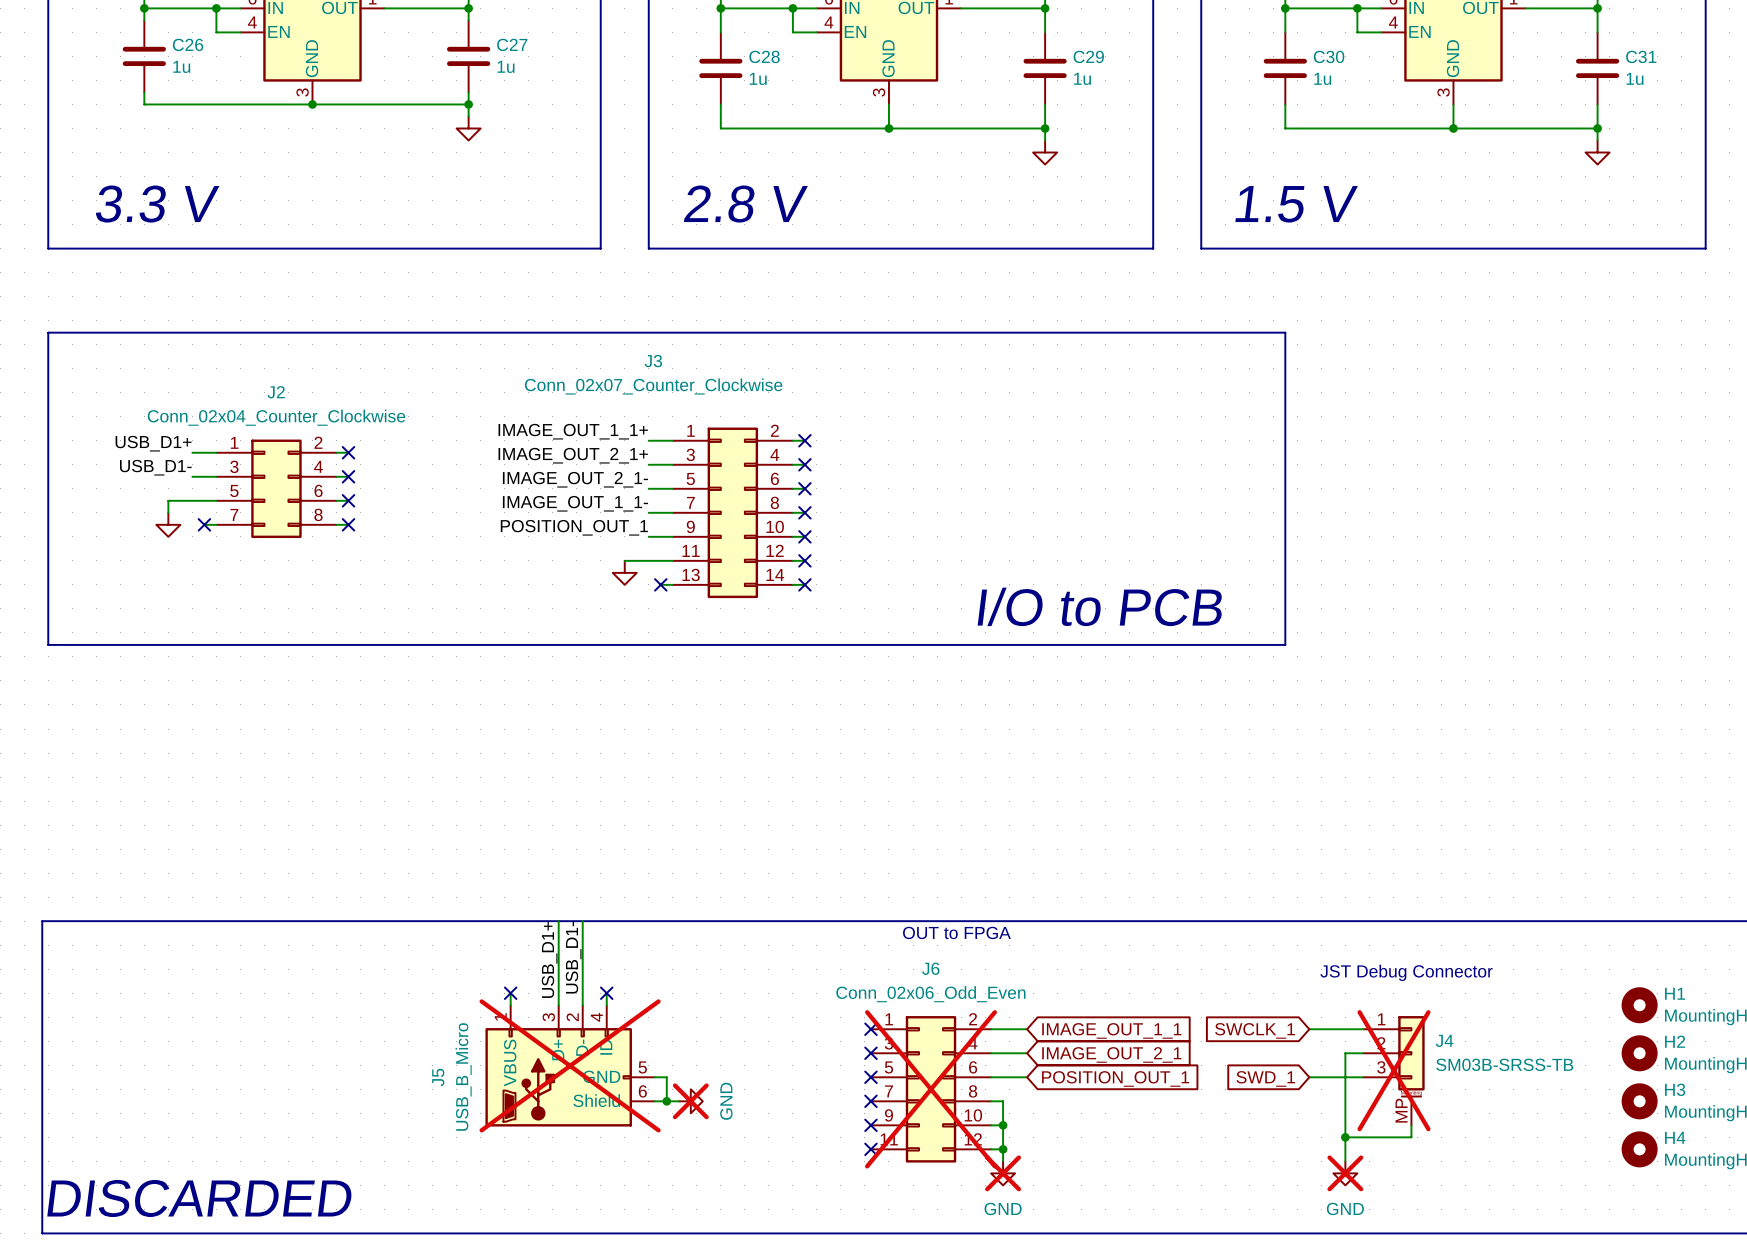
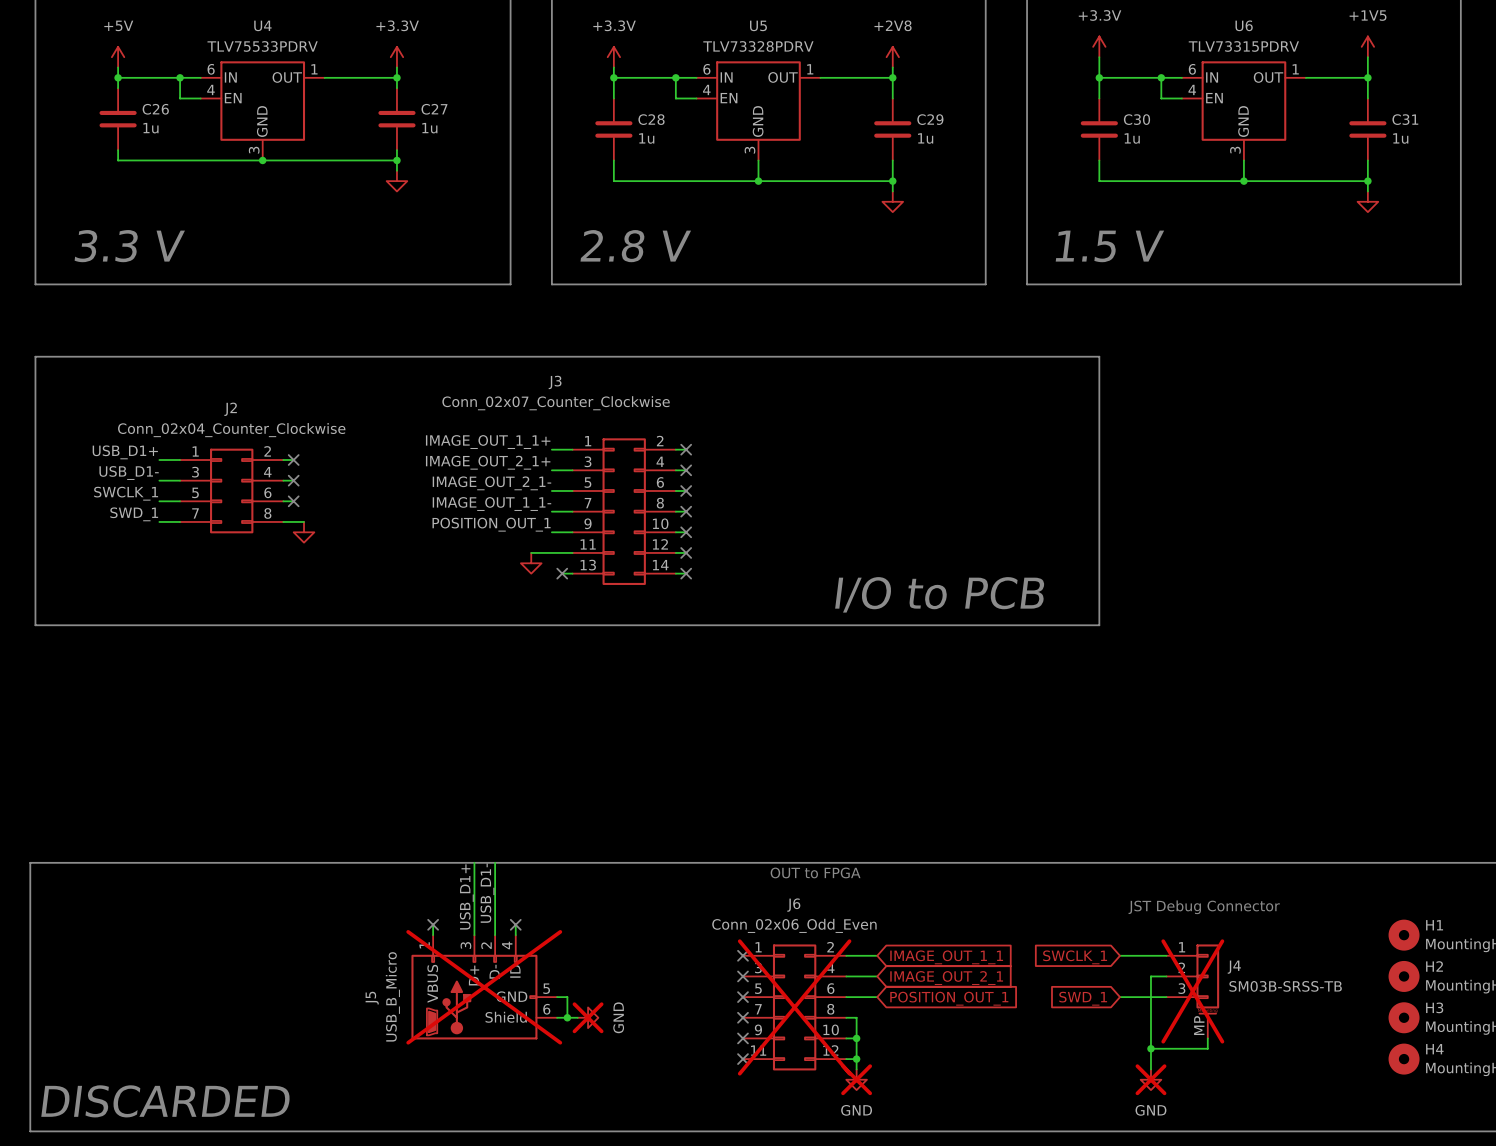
label: none -> SWCLK_1 (126, 493)
wire: (192, 500) (168, 500) (168, 512) -> none
label: none -> SWD_1 (134, 514)
power symbol position: (168, 524) -> (304, 532)
wire: none -> (159, 521) (169, 521)
no-connect mark: (204, 524) -> none
wire: none -> (293, 521) (304, 521)
no-connect mark: (348, 524) -> none

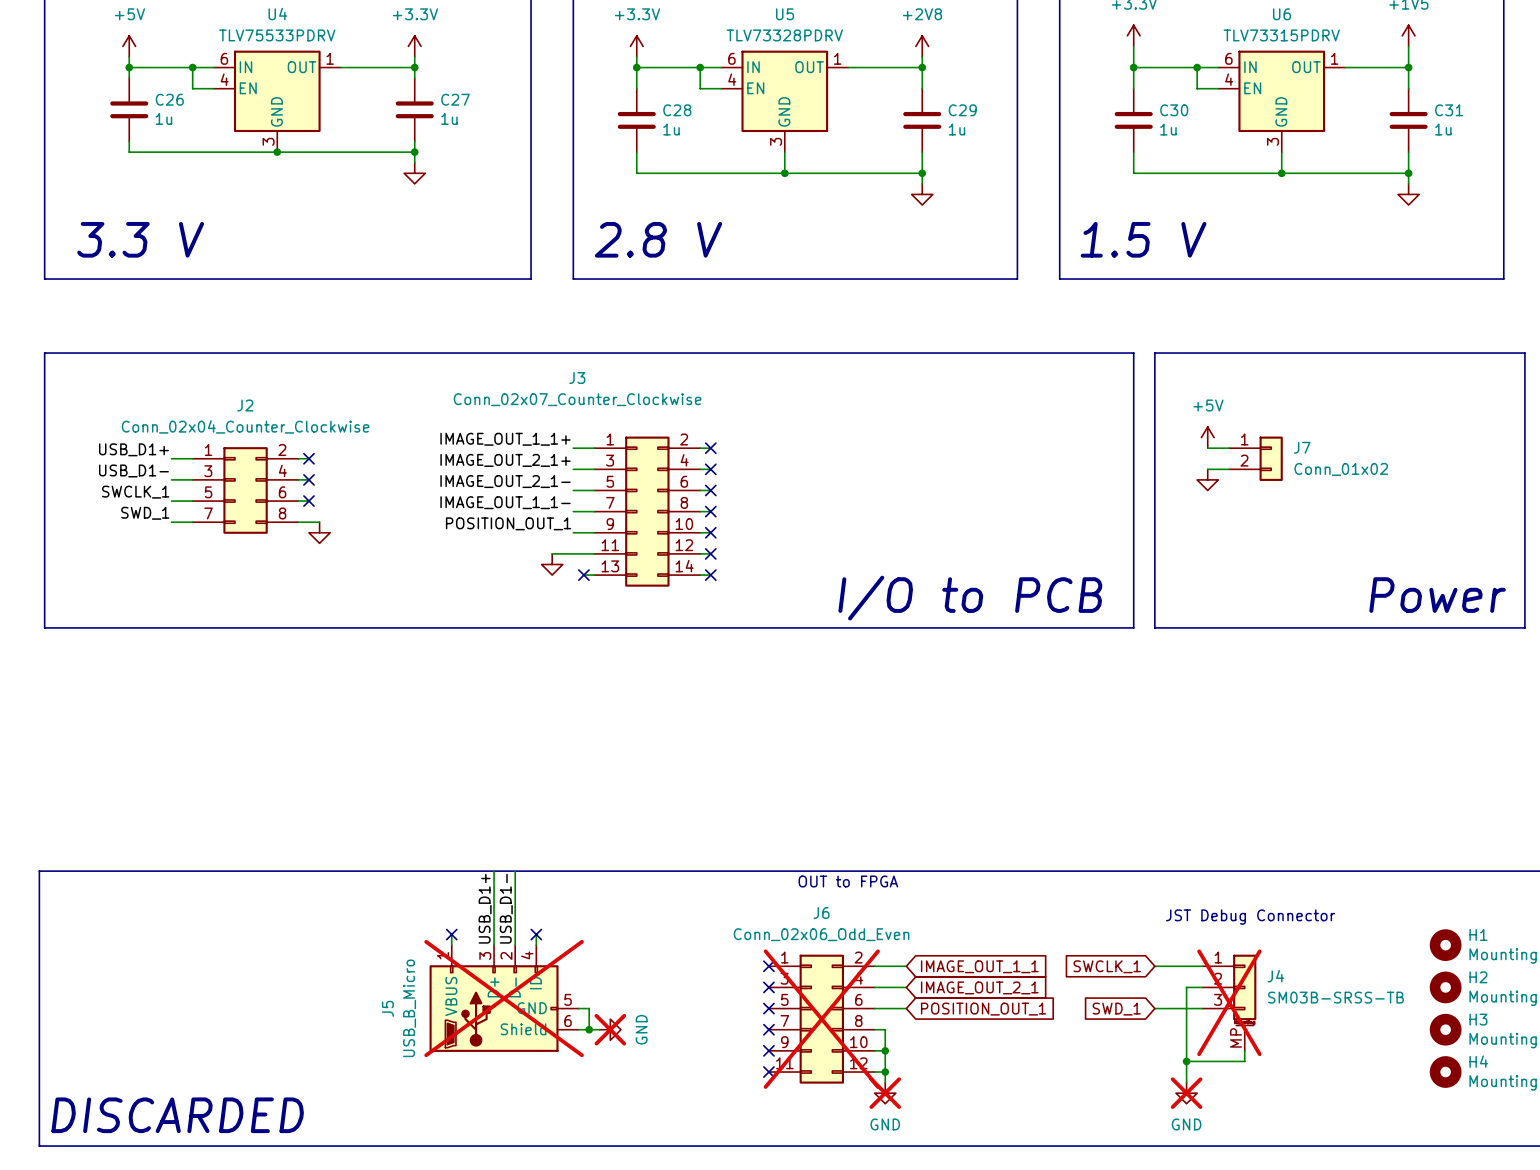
line: none -> (1154, 353) (1524, 353) (1524, 627) (1154, 627) (1154, 353)
power symbol: none -> +5V (1207, 437)
wire: none -> (1207, 448) (1228, 448)
J7: none -> Conn_01x02 (1255, 458)
wire: none -> (1207, 469) (1228, 469)
power symbol: none -> (1207, 479)
text: none -> Power (1437, 595)

